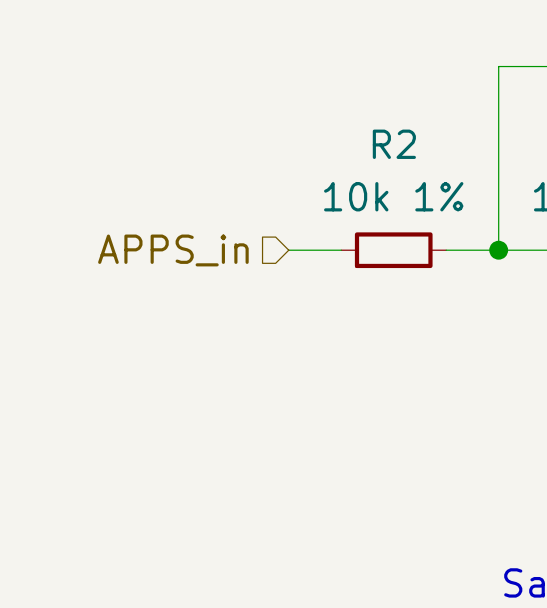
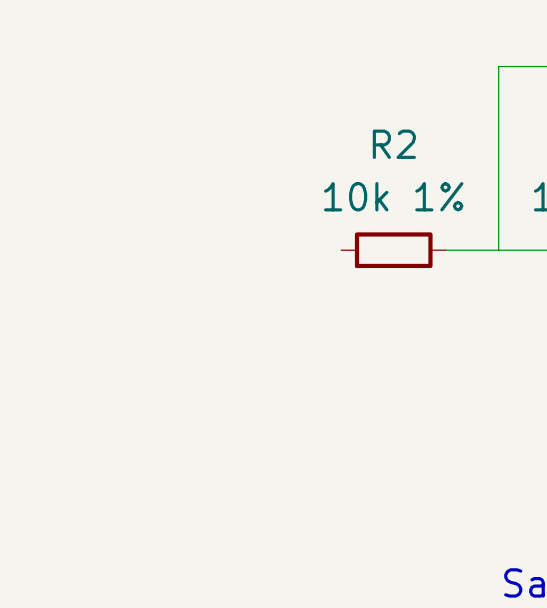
hierarchical label: APPS_in (173, 250) -> none
wire: (288, 250) (341, 250) -> none
junction: (498, 250) -> none

